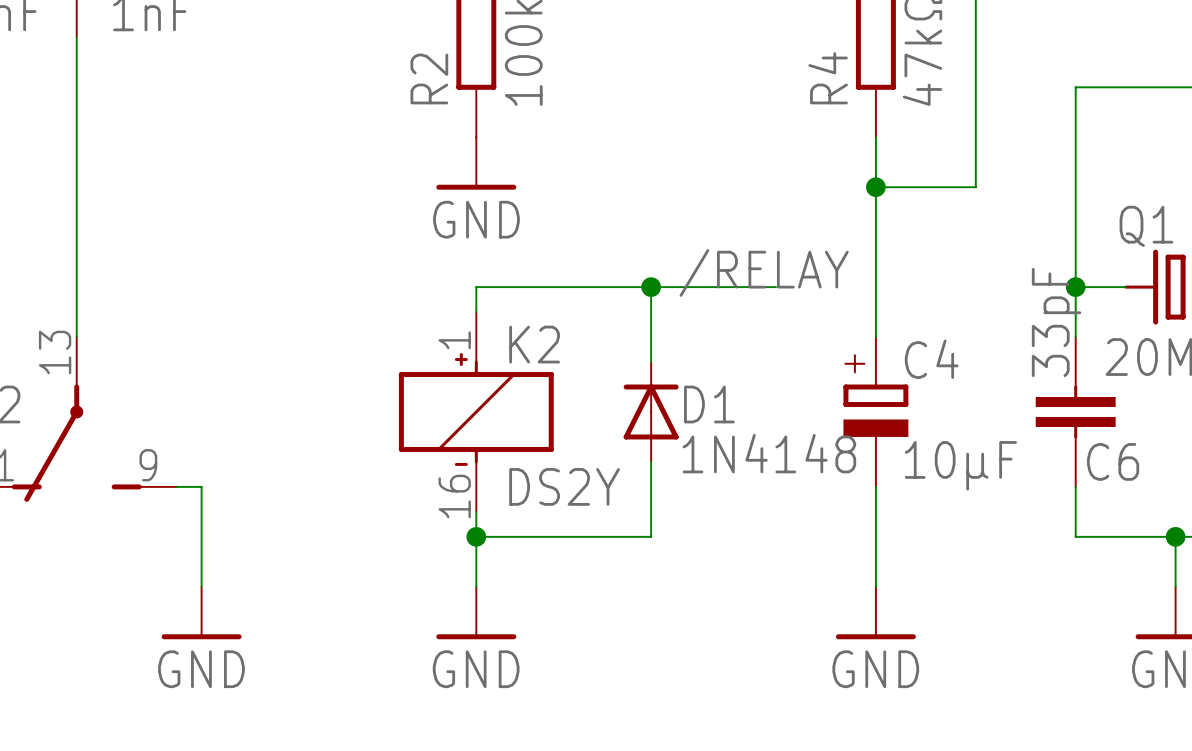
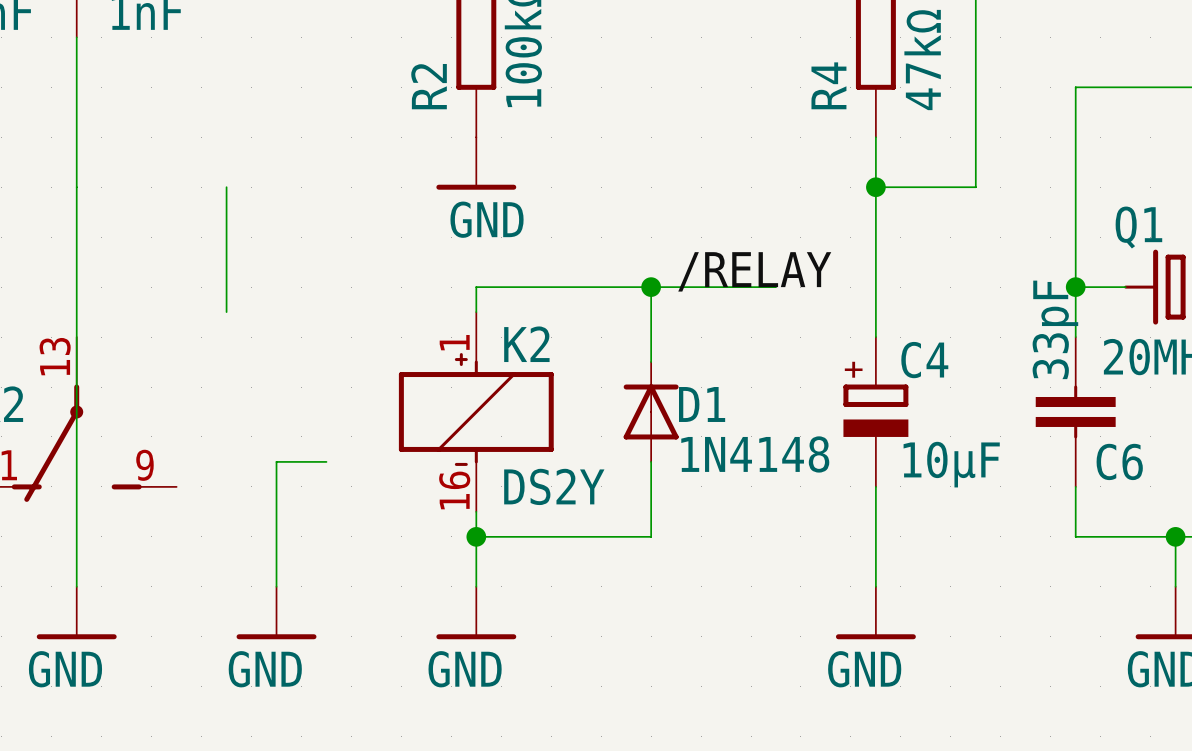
wire: none -> (226, 187) (226, 312)
wire: none -> (76, 337) (76, 586)
wire: none -> (326, 461) (276, 461) (276, 586)
wire: (176, 486) (201, 486) (201, 586) -> none
power symbol: none -> GND (76, 613)
power symbol: GND (201, 613) -> none
power symbol: none -> GND (276, 613)

